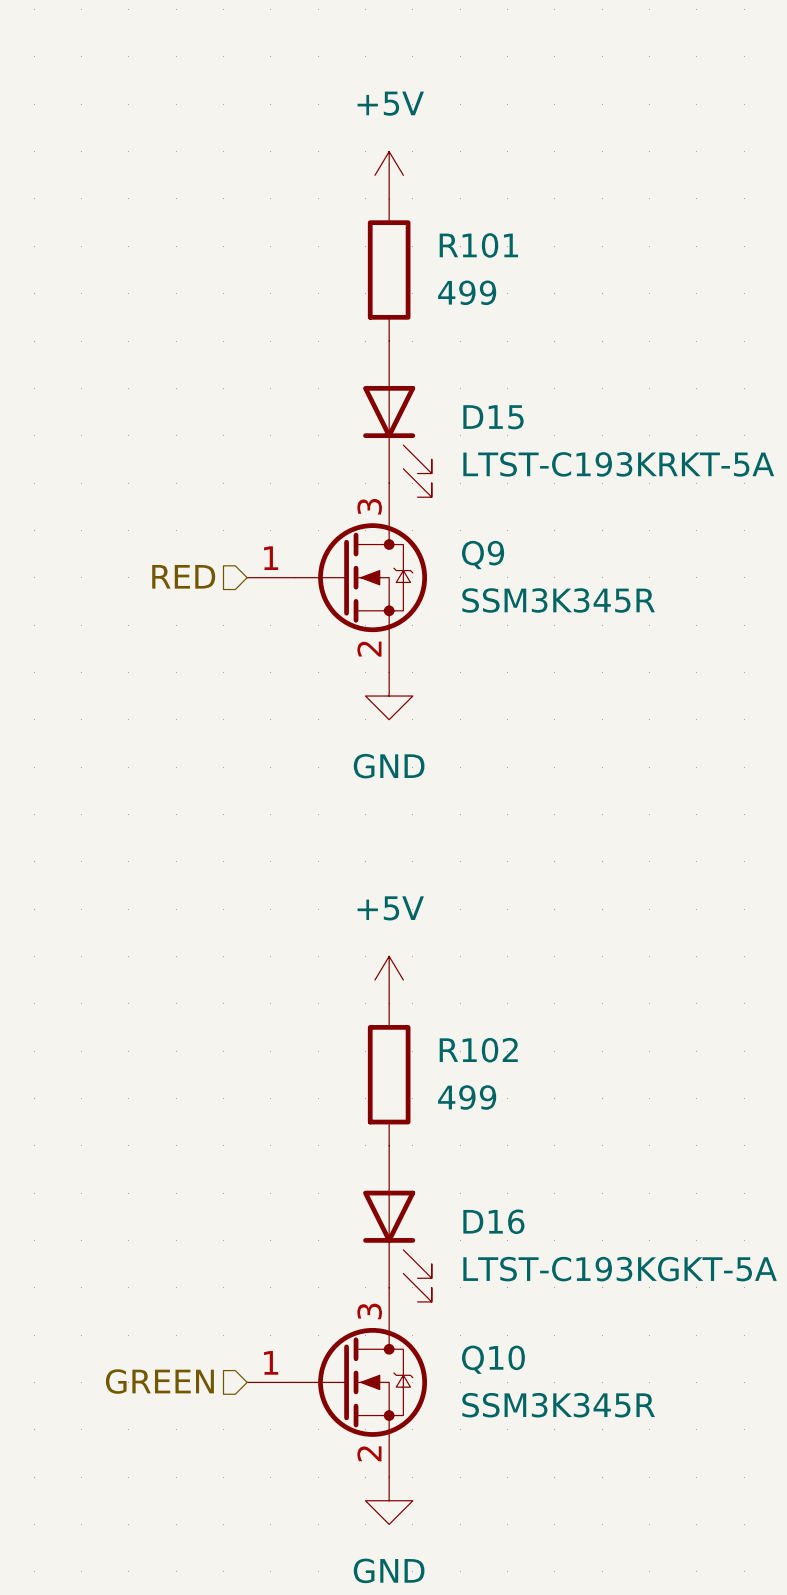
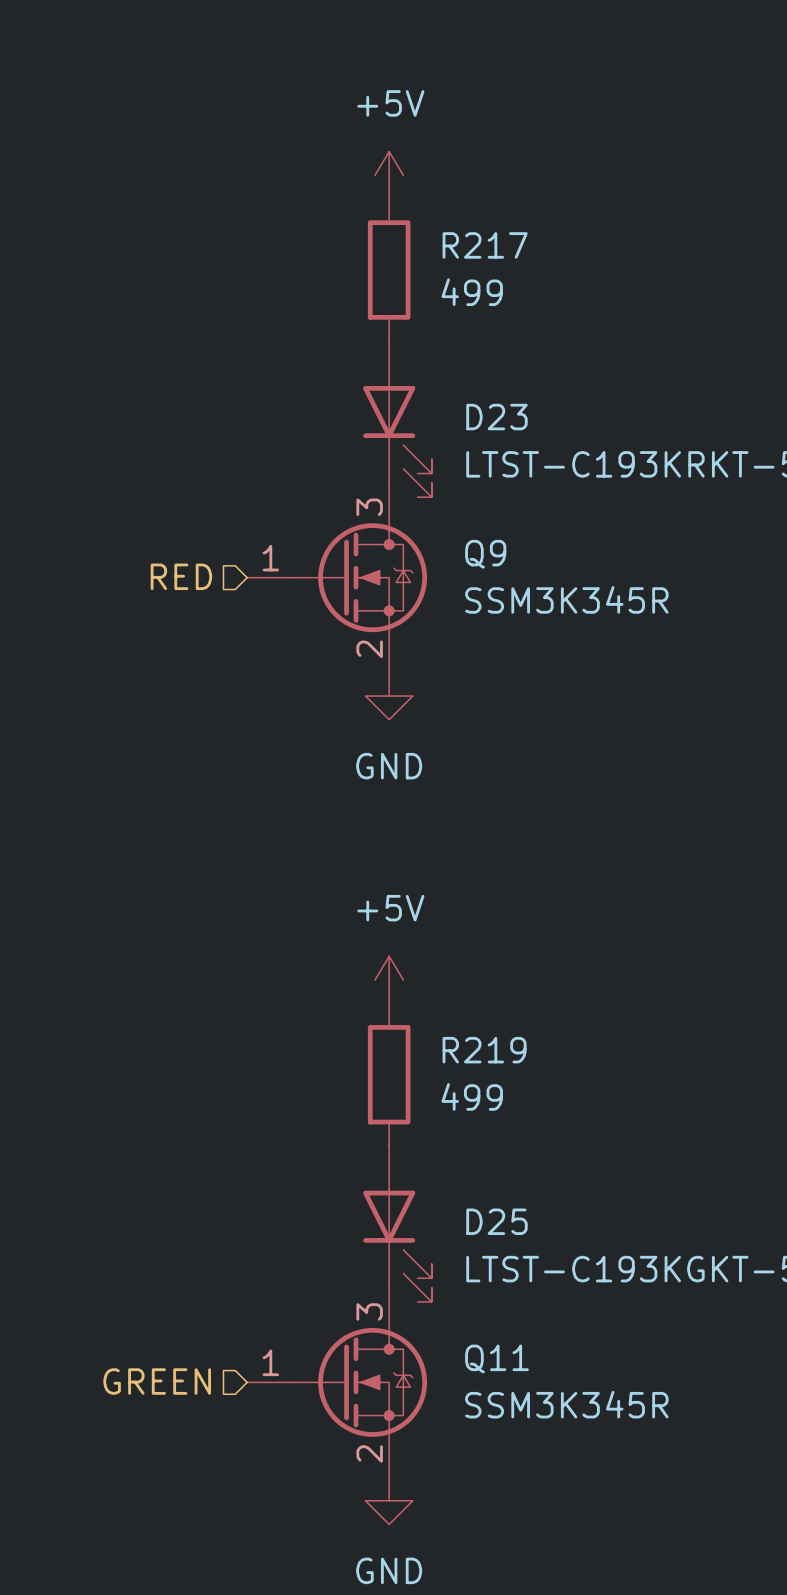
R101 name: R101 (478, 245) -> R217 (485, 245)
D15 name: D15 (493, 417) -> D23 (496, 417)
R102 name: R102 (478, 1050) -> R219 (484, 1050)
D16 name: D16 (493, 1221) -> D25 (496, 1221)
Q10 name: Q10 (493, 1359) -> Q11 (496, 1358)

